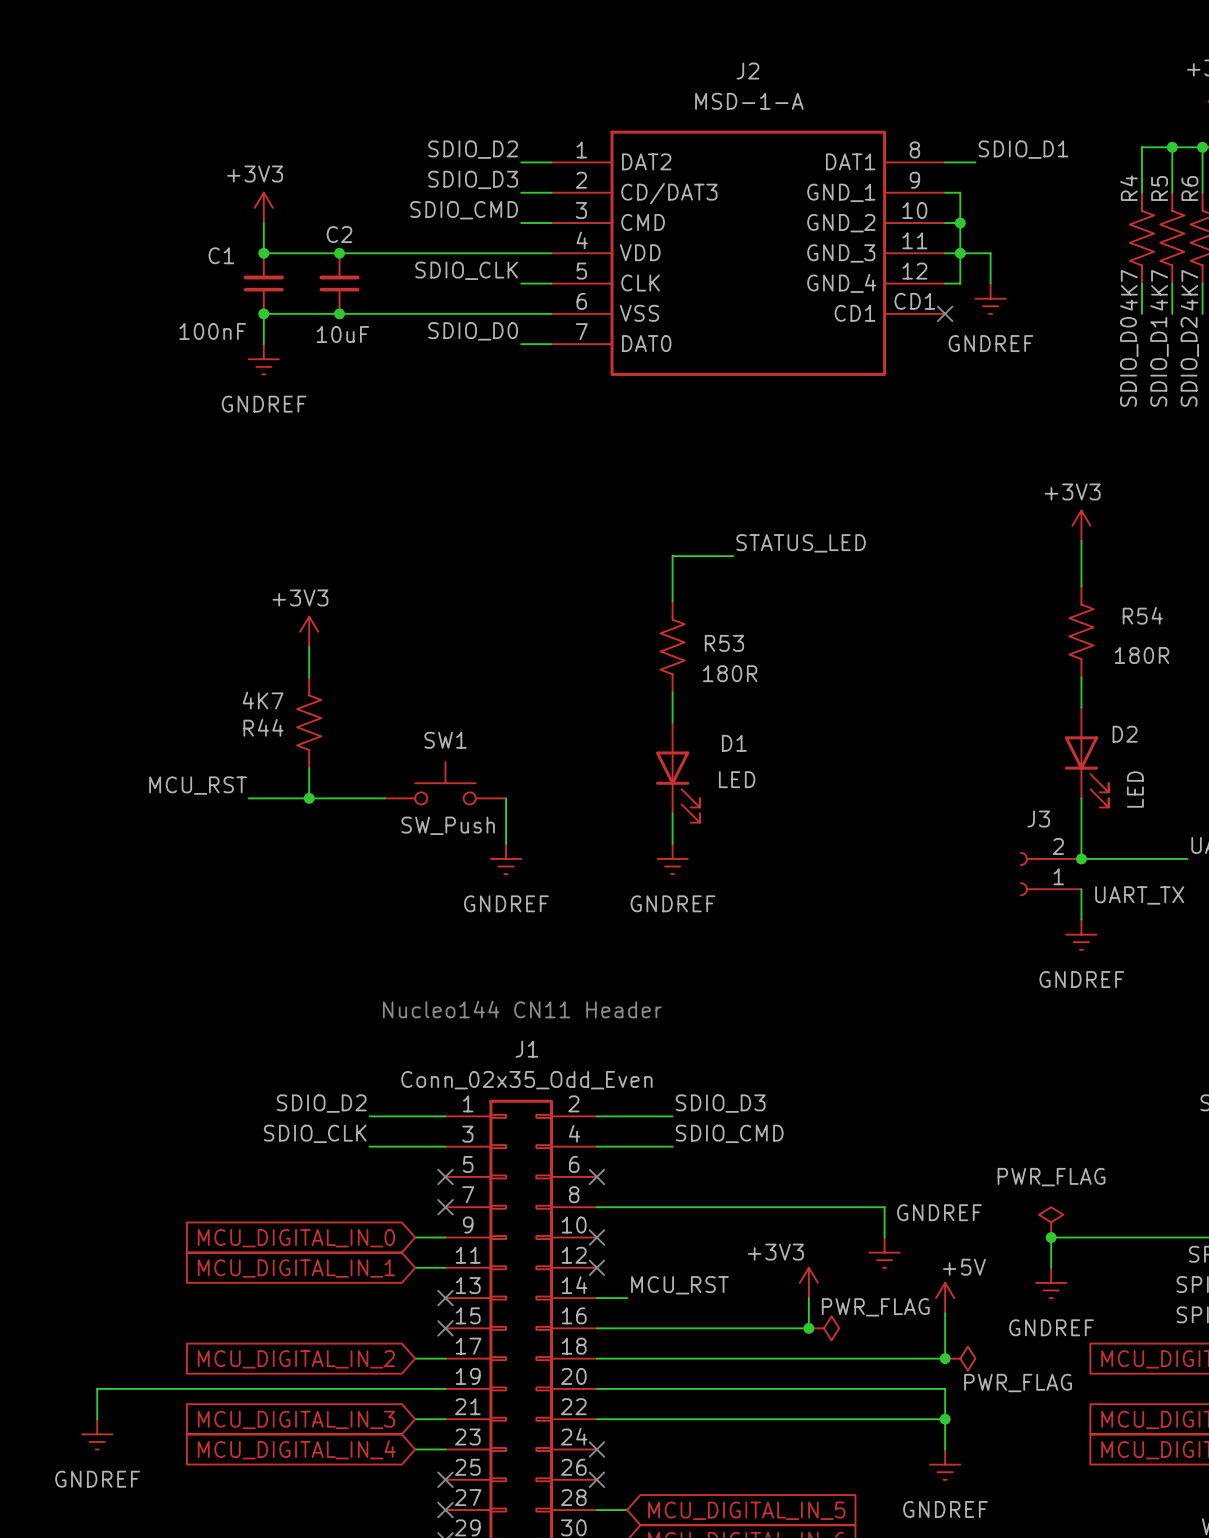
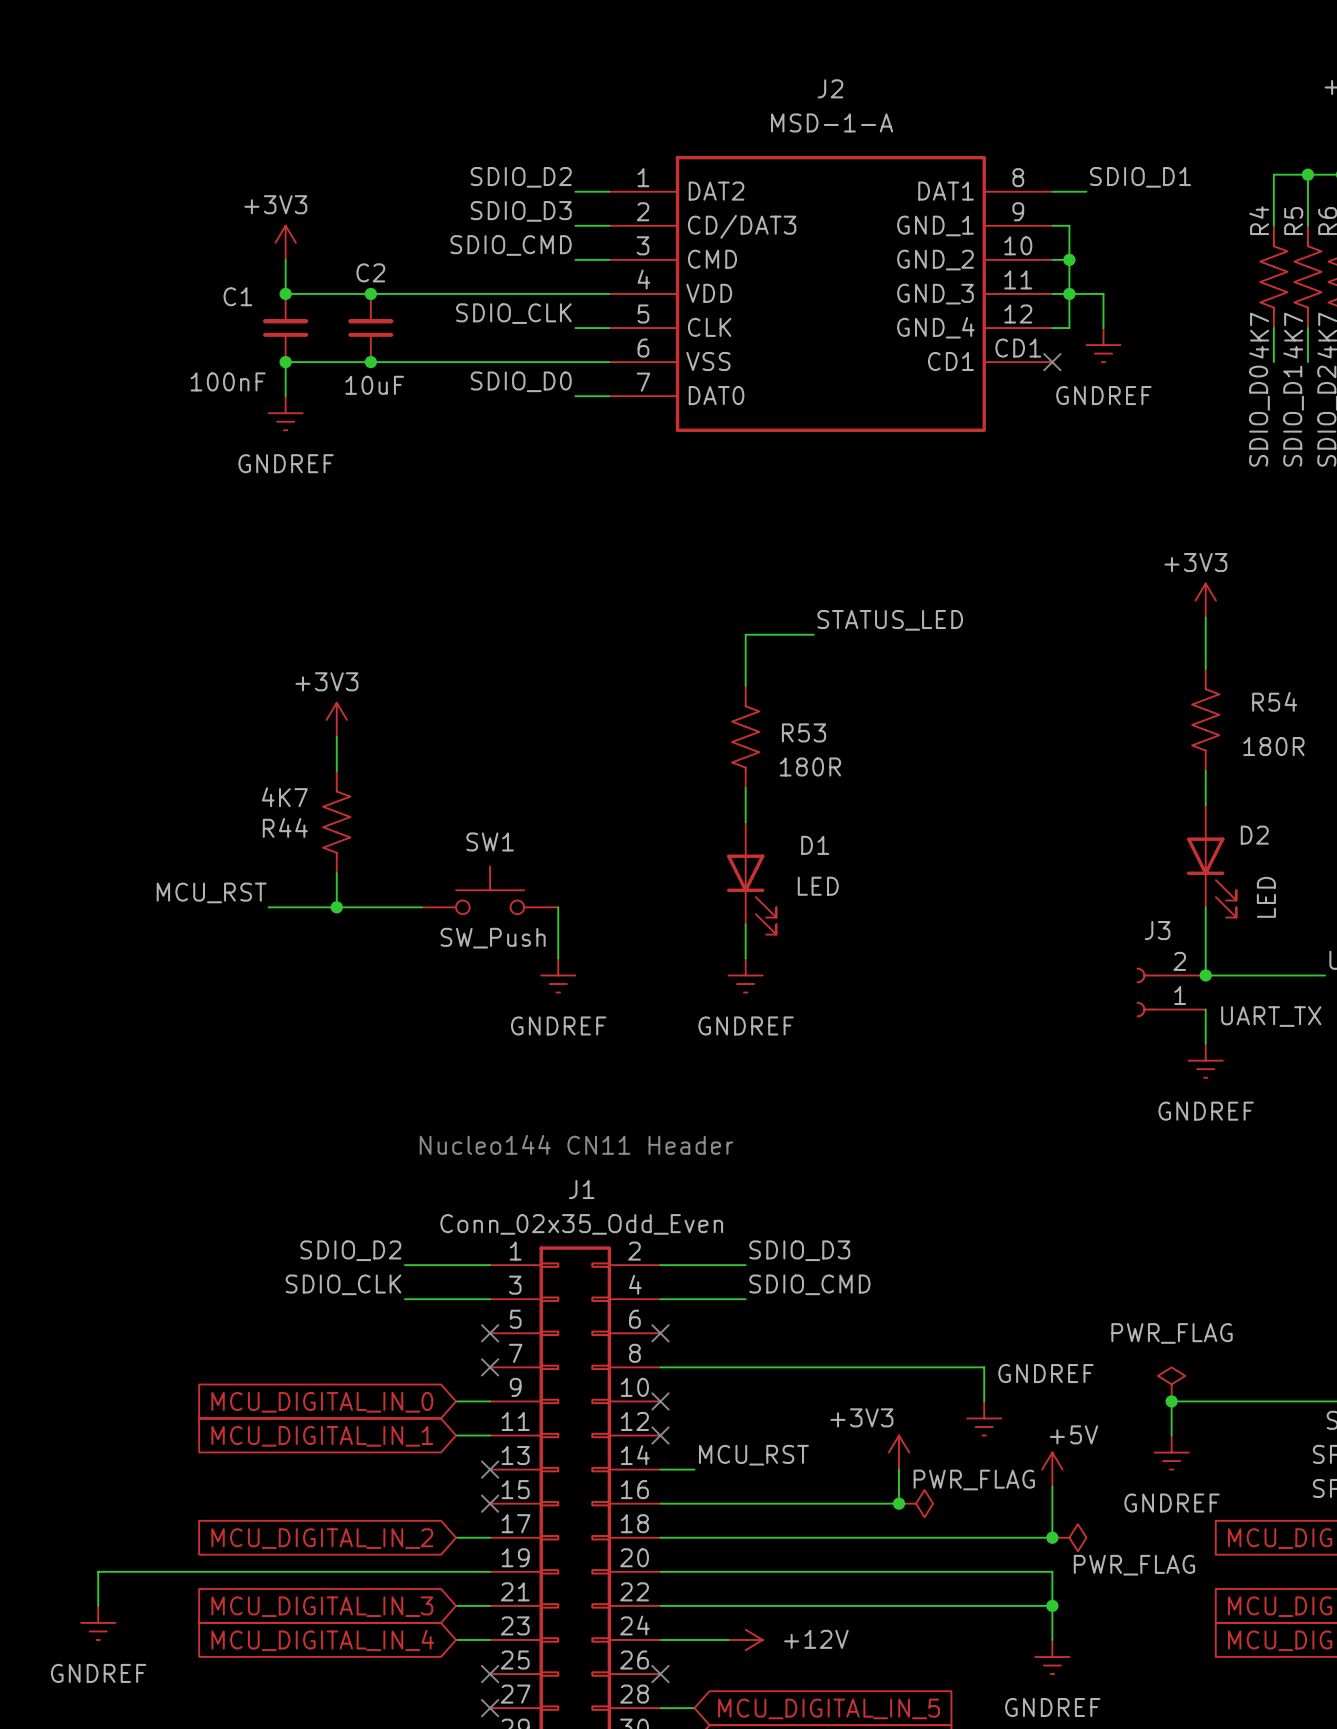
wire: none -> (660, 1639) (728, 1639)
no-connect mark: (596, 1449) -> none
power symbol: none -> +12V (745, 1639)

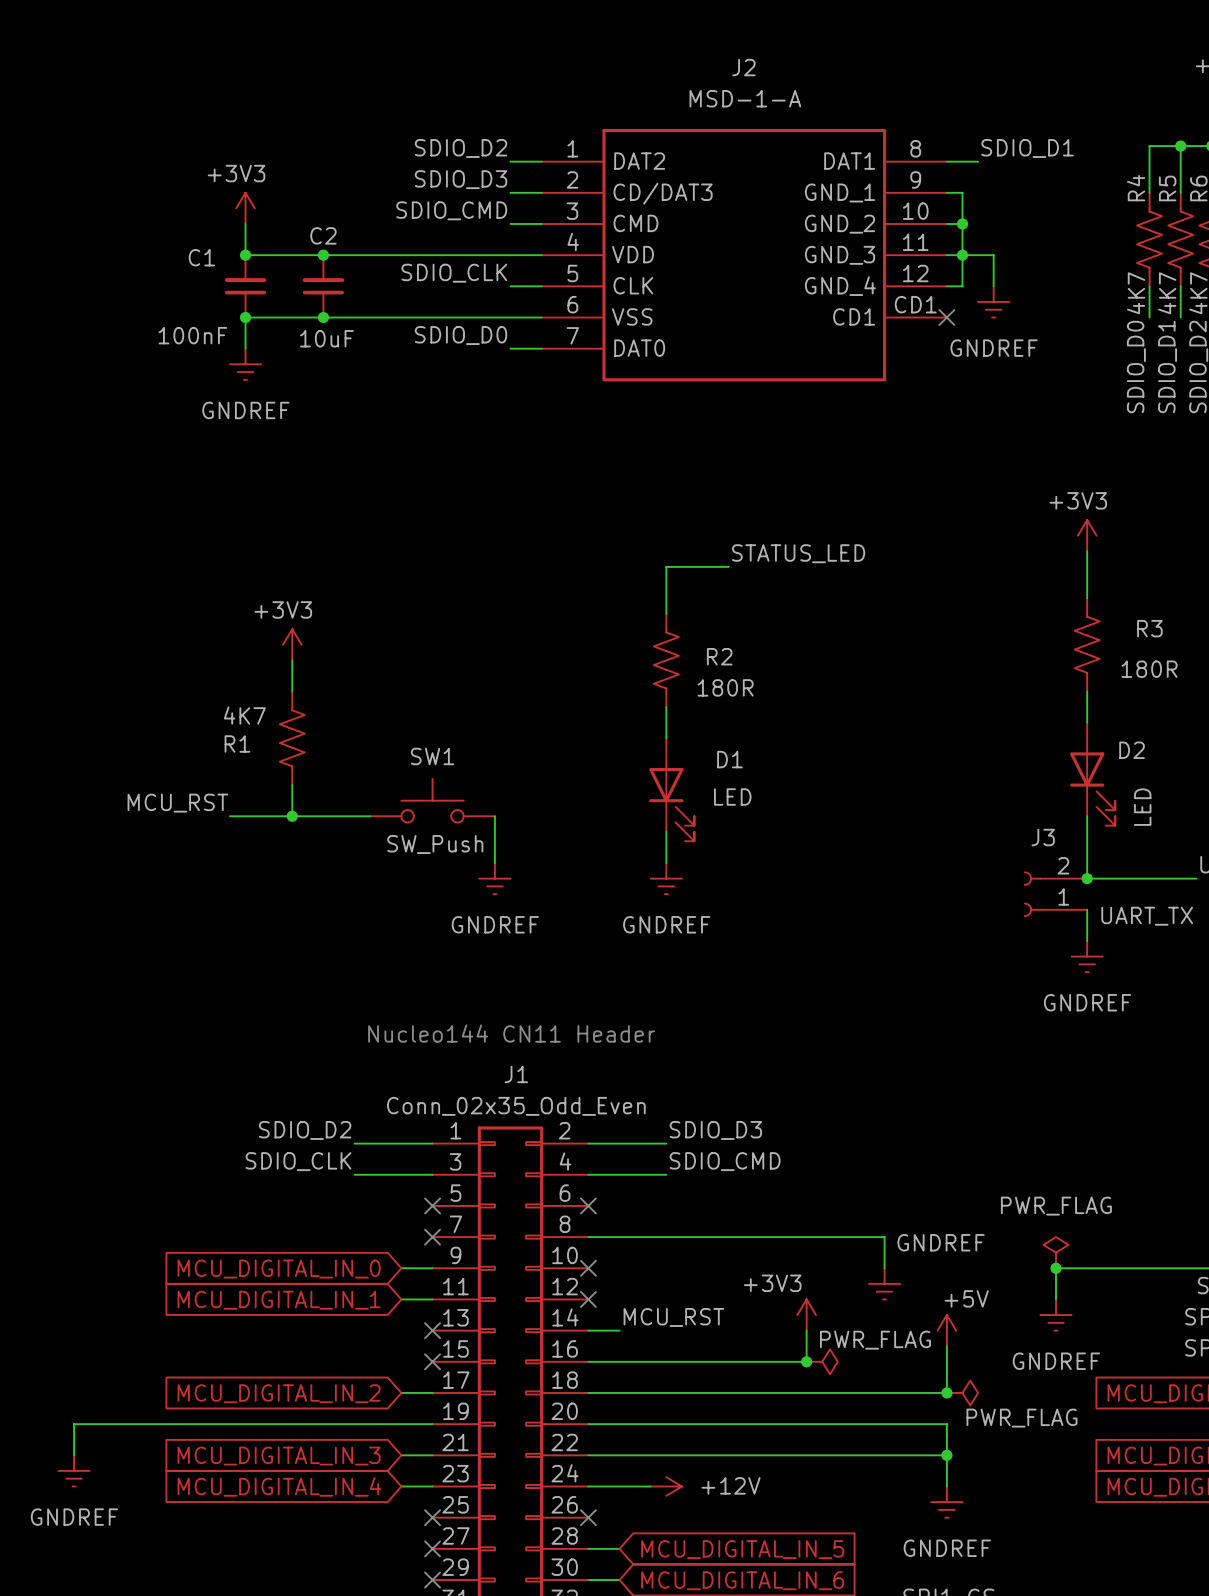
R54 name: R54 (1274, 701) -> R3 (1149, 628)
R53 name: R53 (804, 732) -> R2 (719, 656)
R44 name: R44 (285, 827) -> R1 (237, 744)

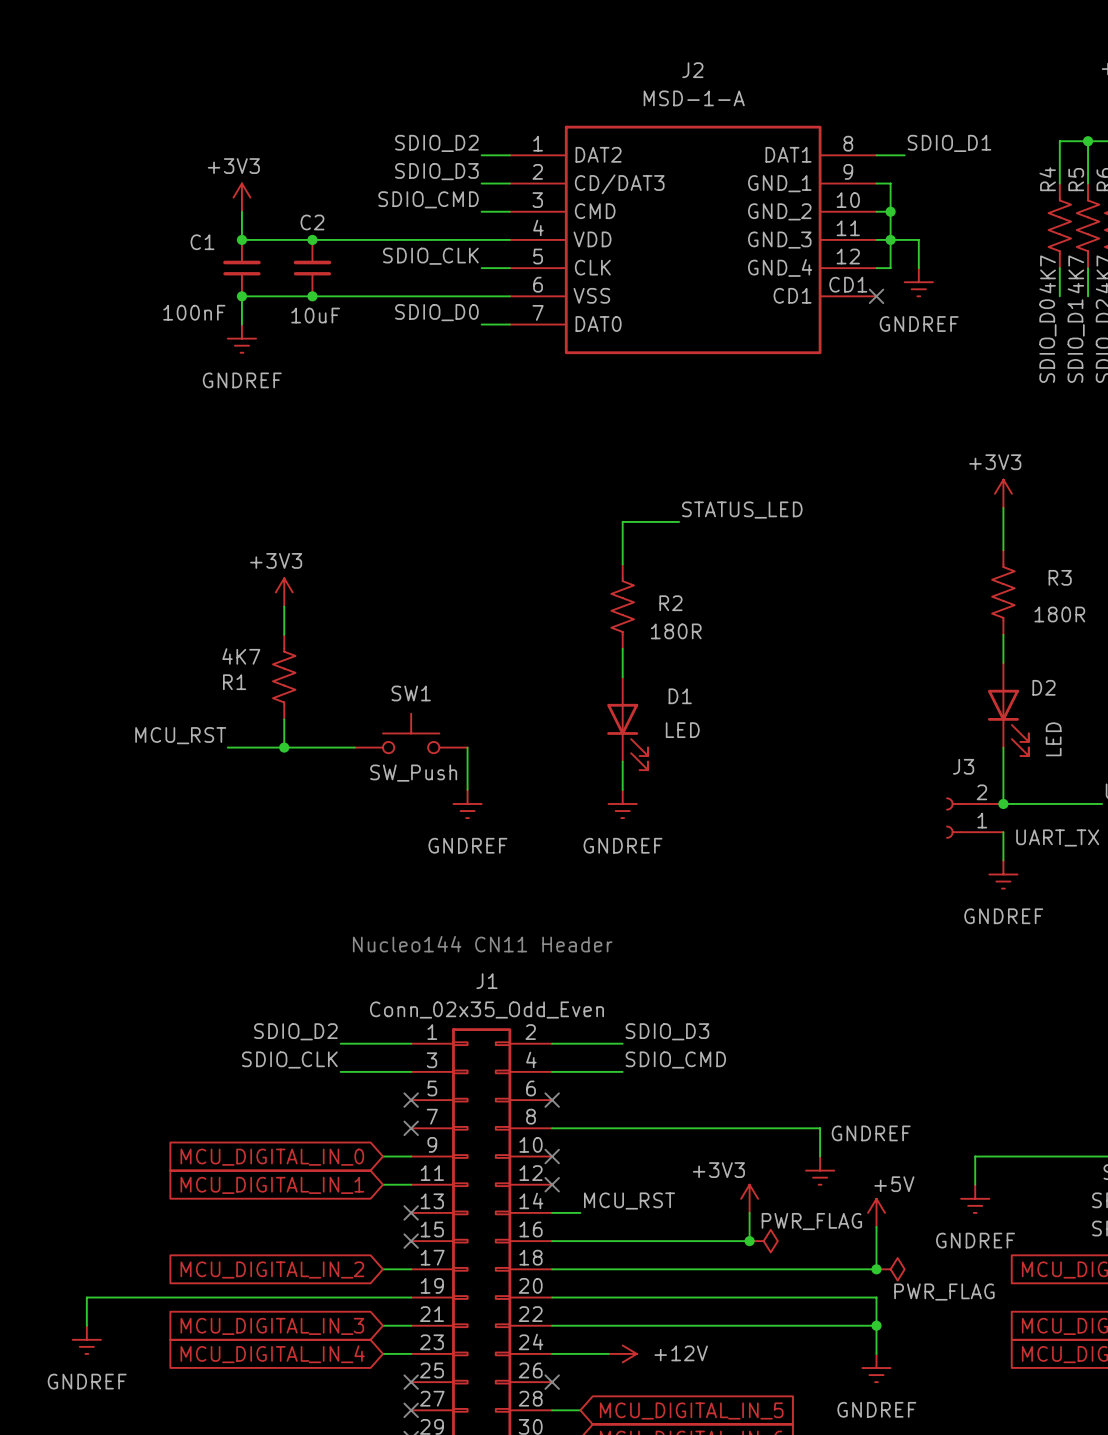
power symbol: PWR_FLAG (1056, 1252) -> none
junction: (1056, 1268) -> none

